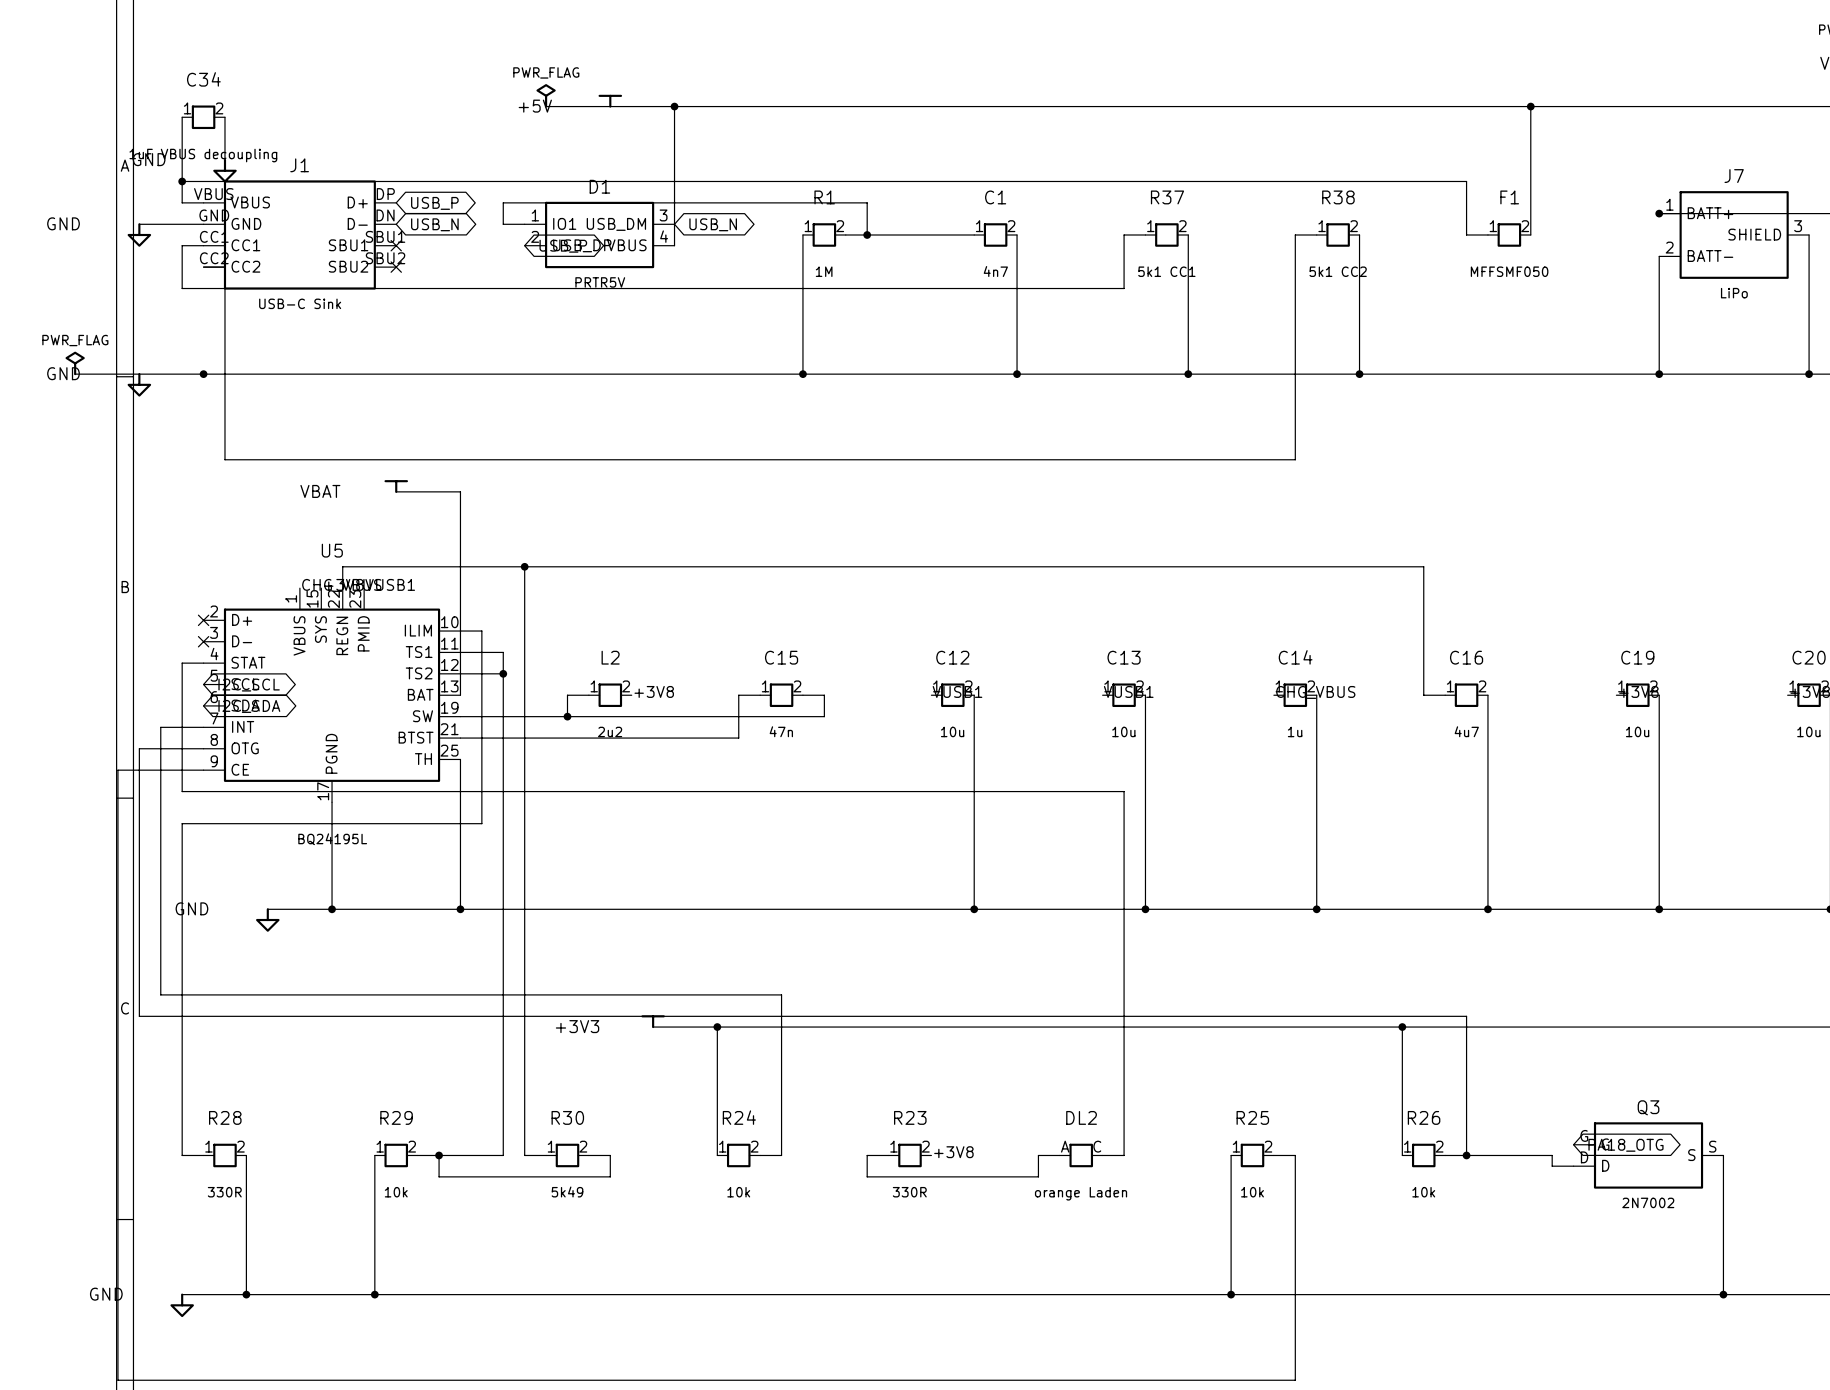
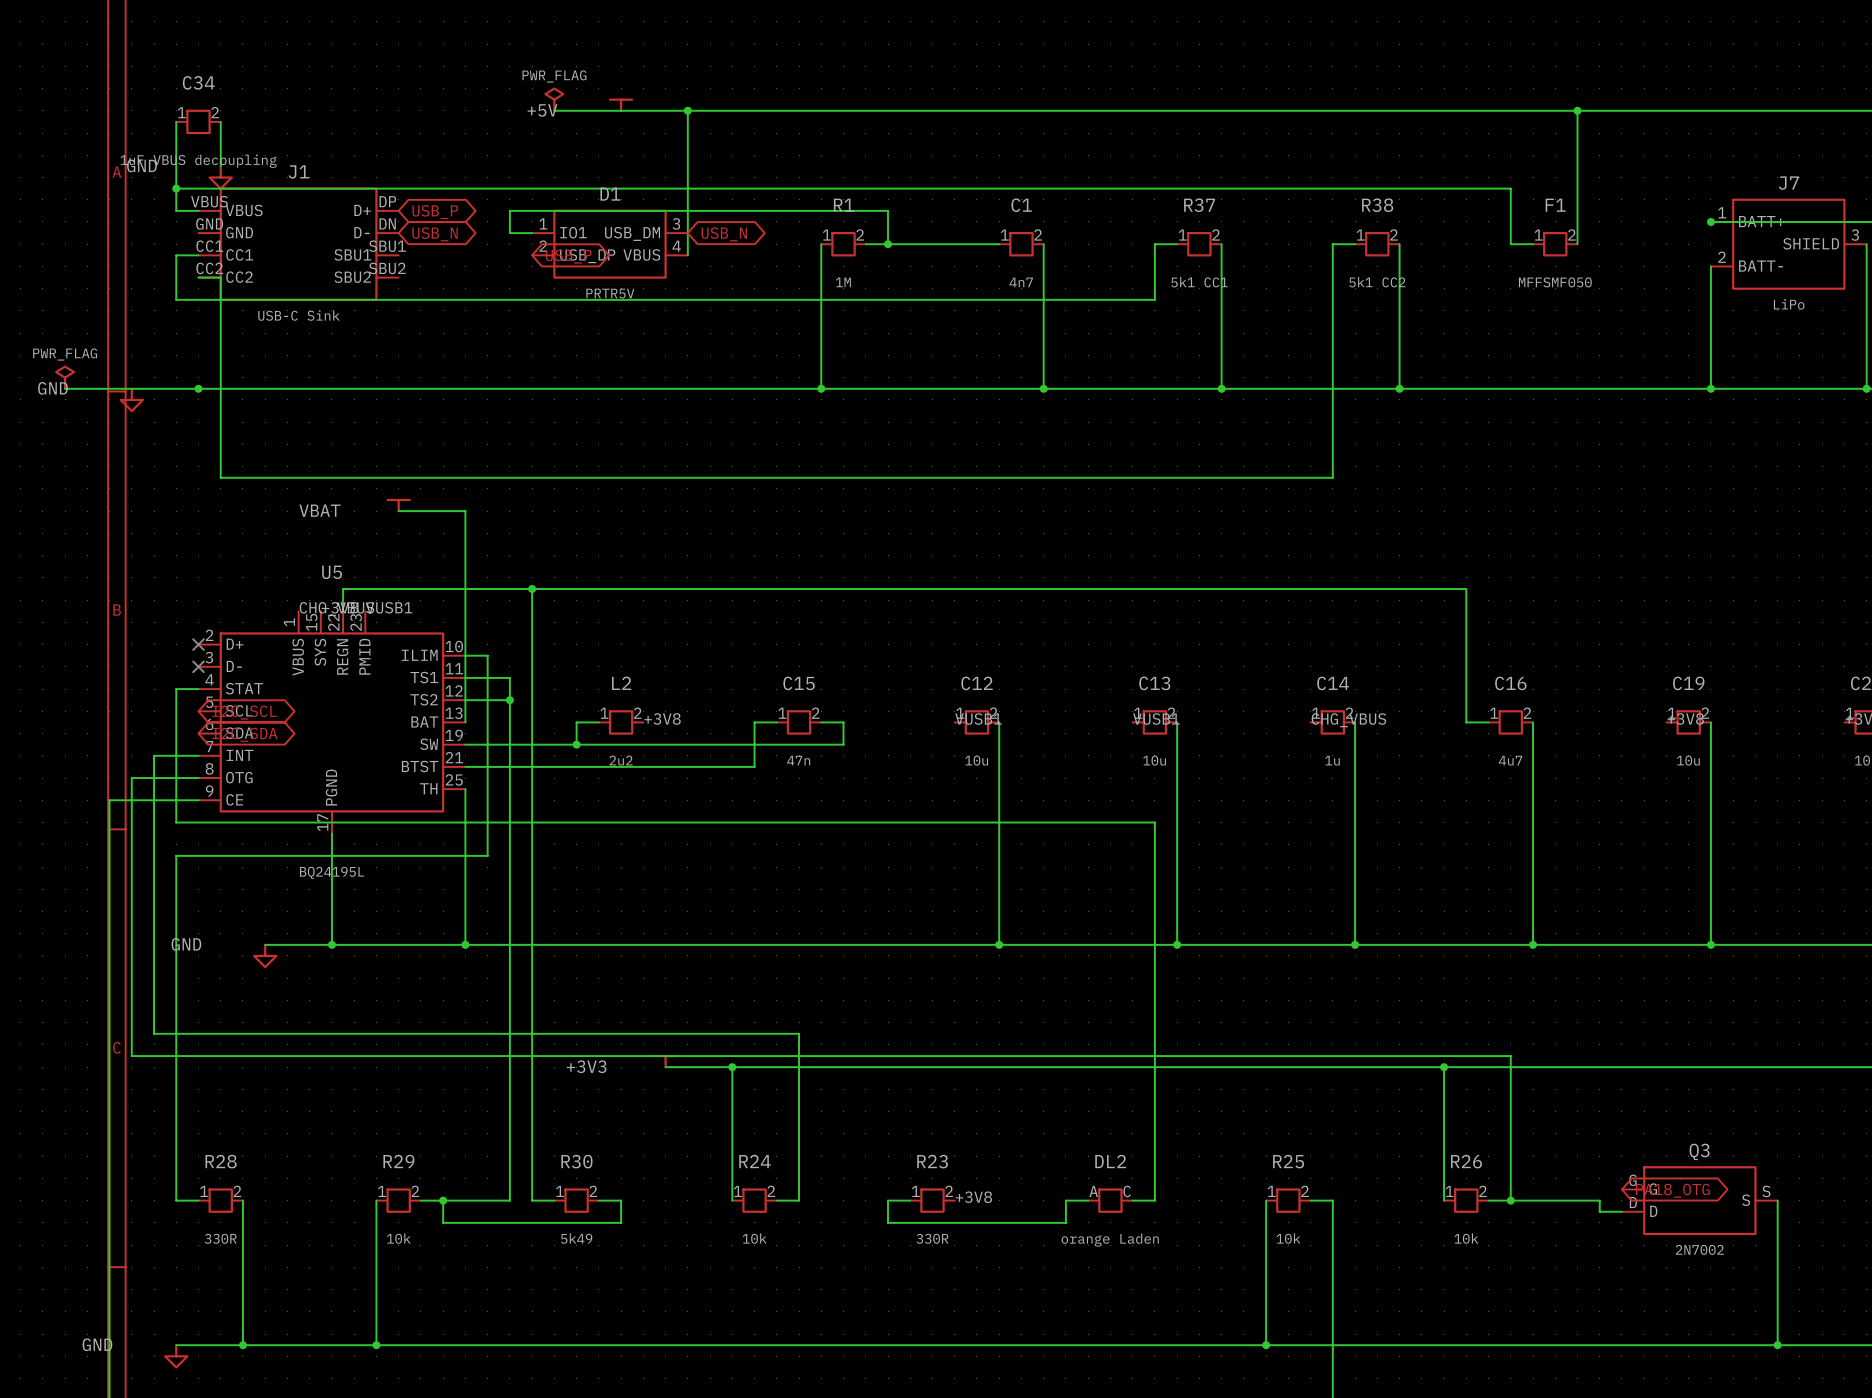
wire: (139, 224) (203, 224) -> none
power symbol: GND (139, 235) -> none
no-connect mark: (396, 245) -> none
no-connect mark: (396, 267) -> none

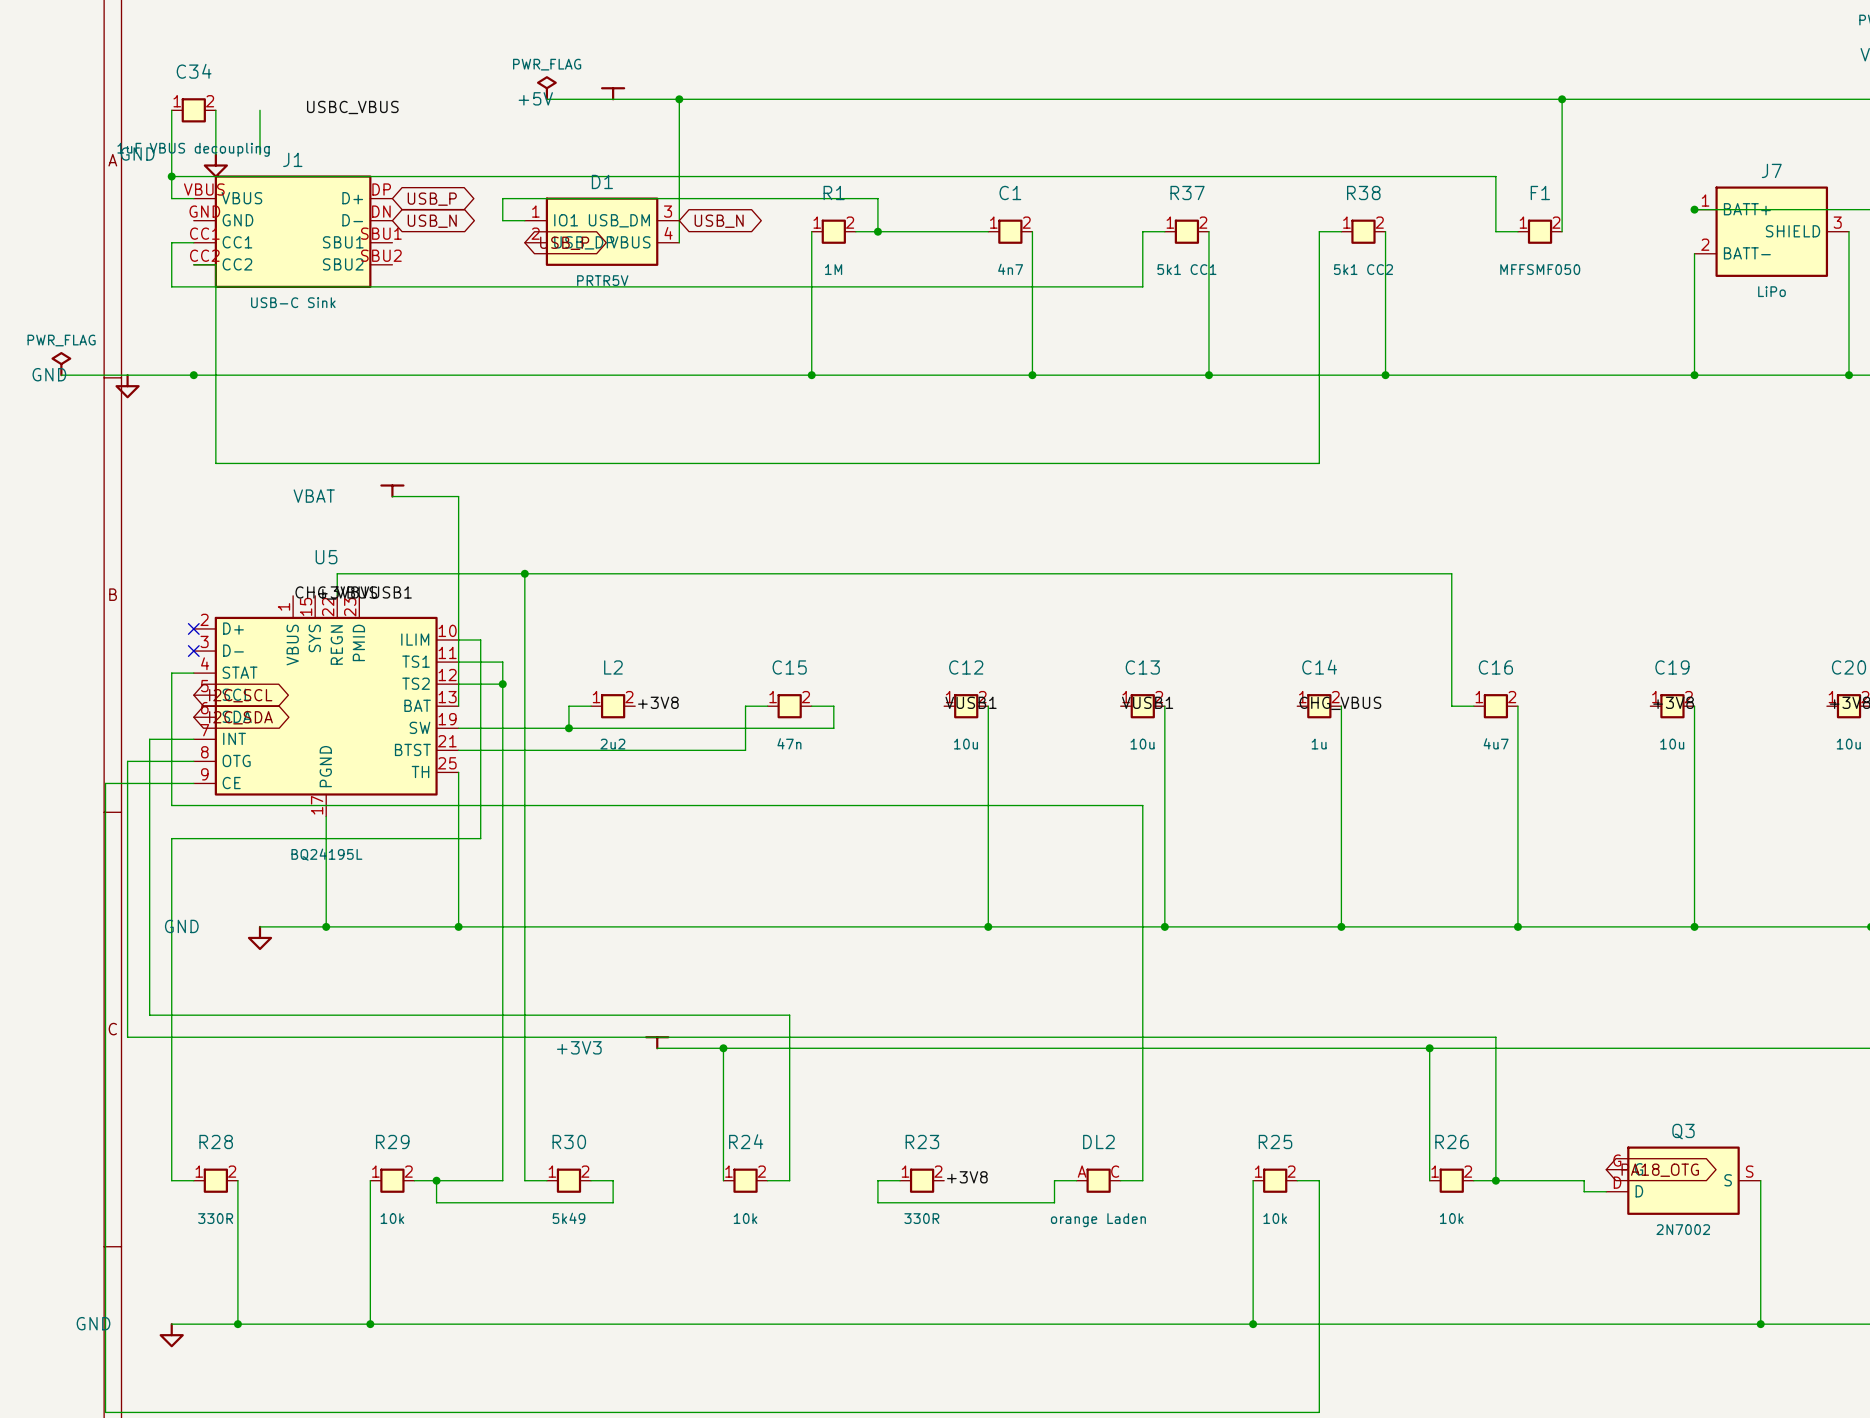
label: none -> USBC_VBUS (352, 107)
wire: none -> (260, 110) (260, 154)

